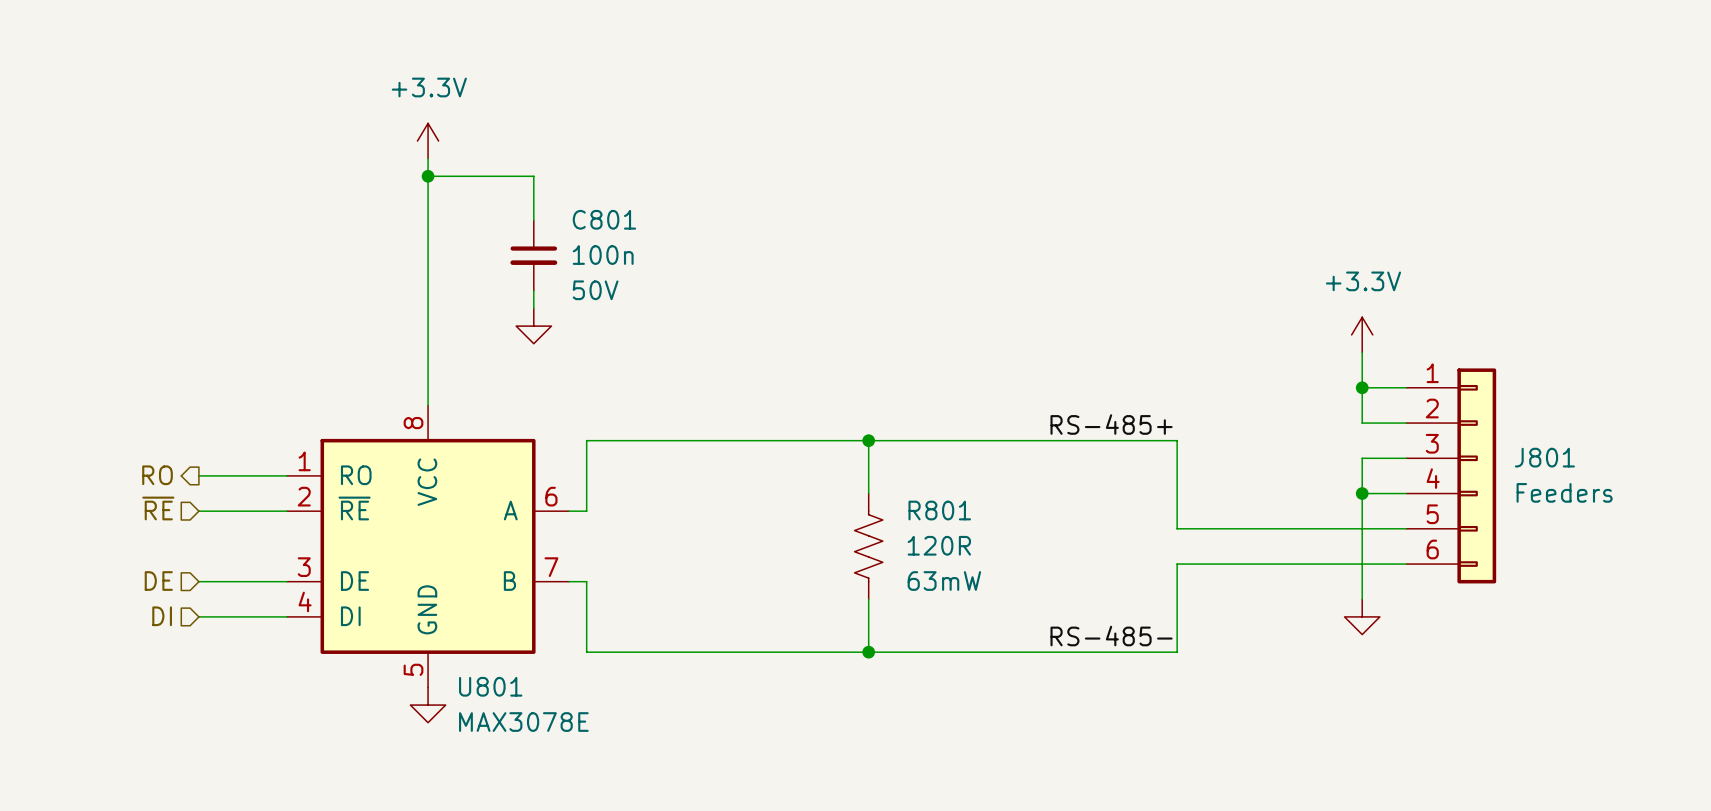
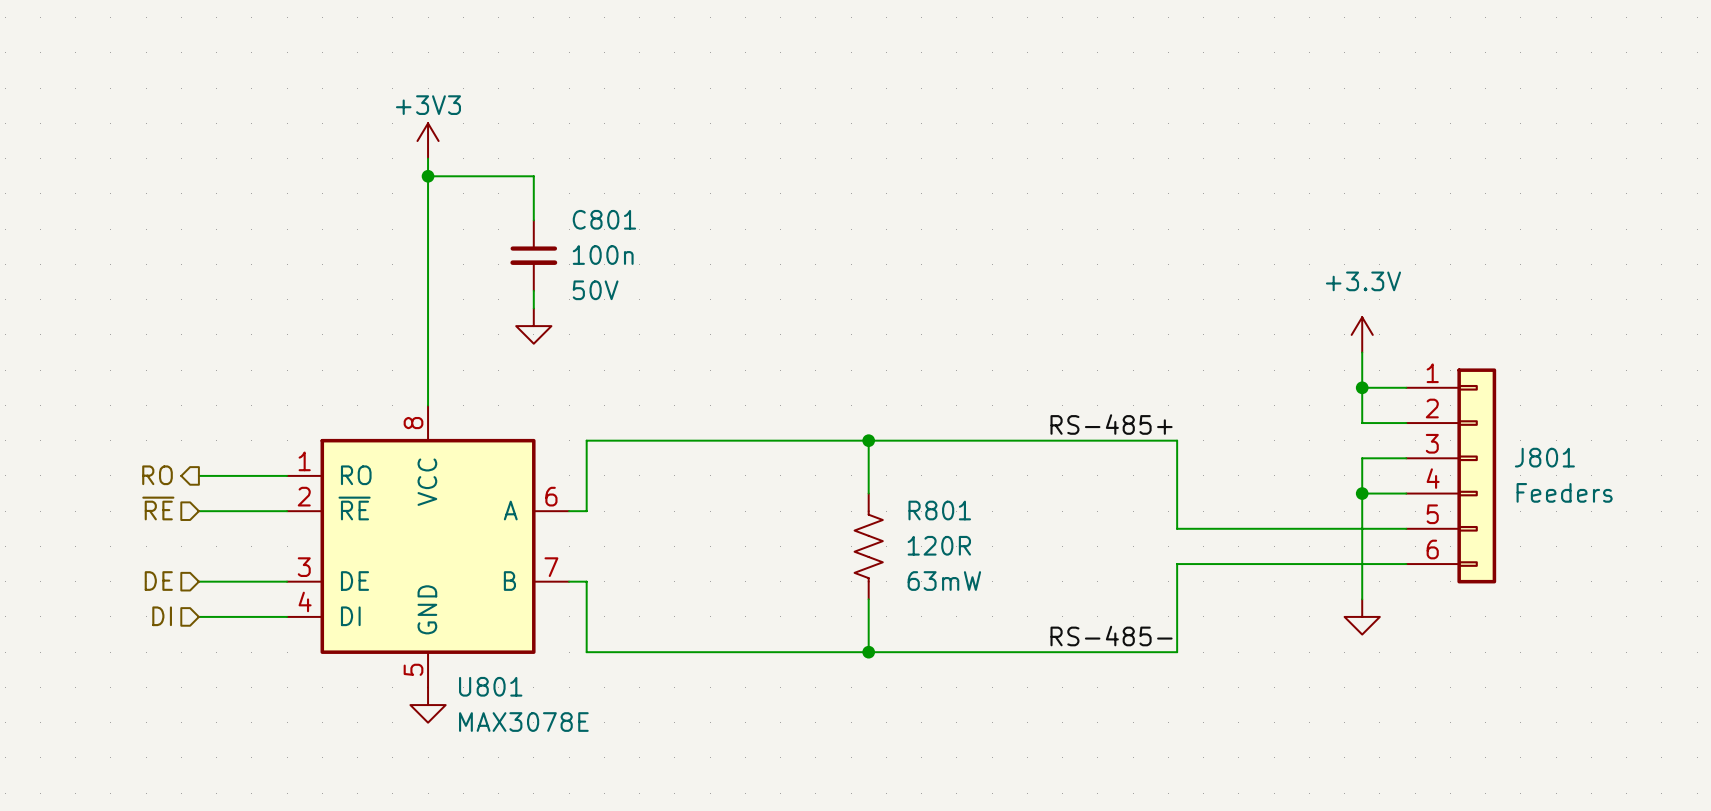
power symbol: +3.3V (428, 141) -> +3V3 (428, 141)

